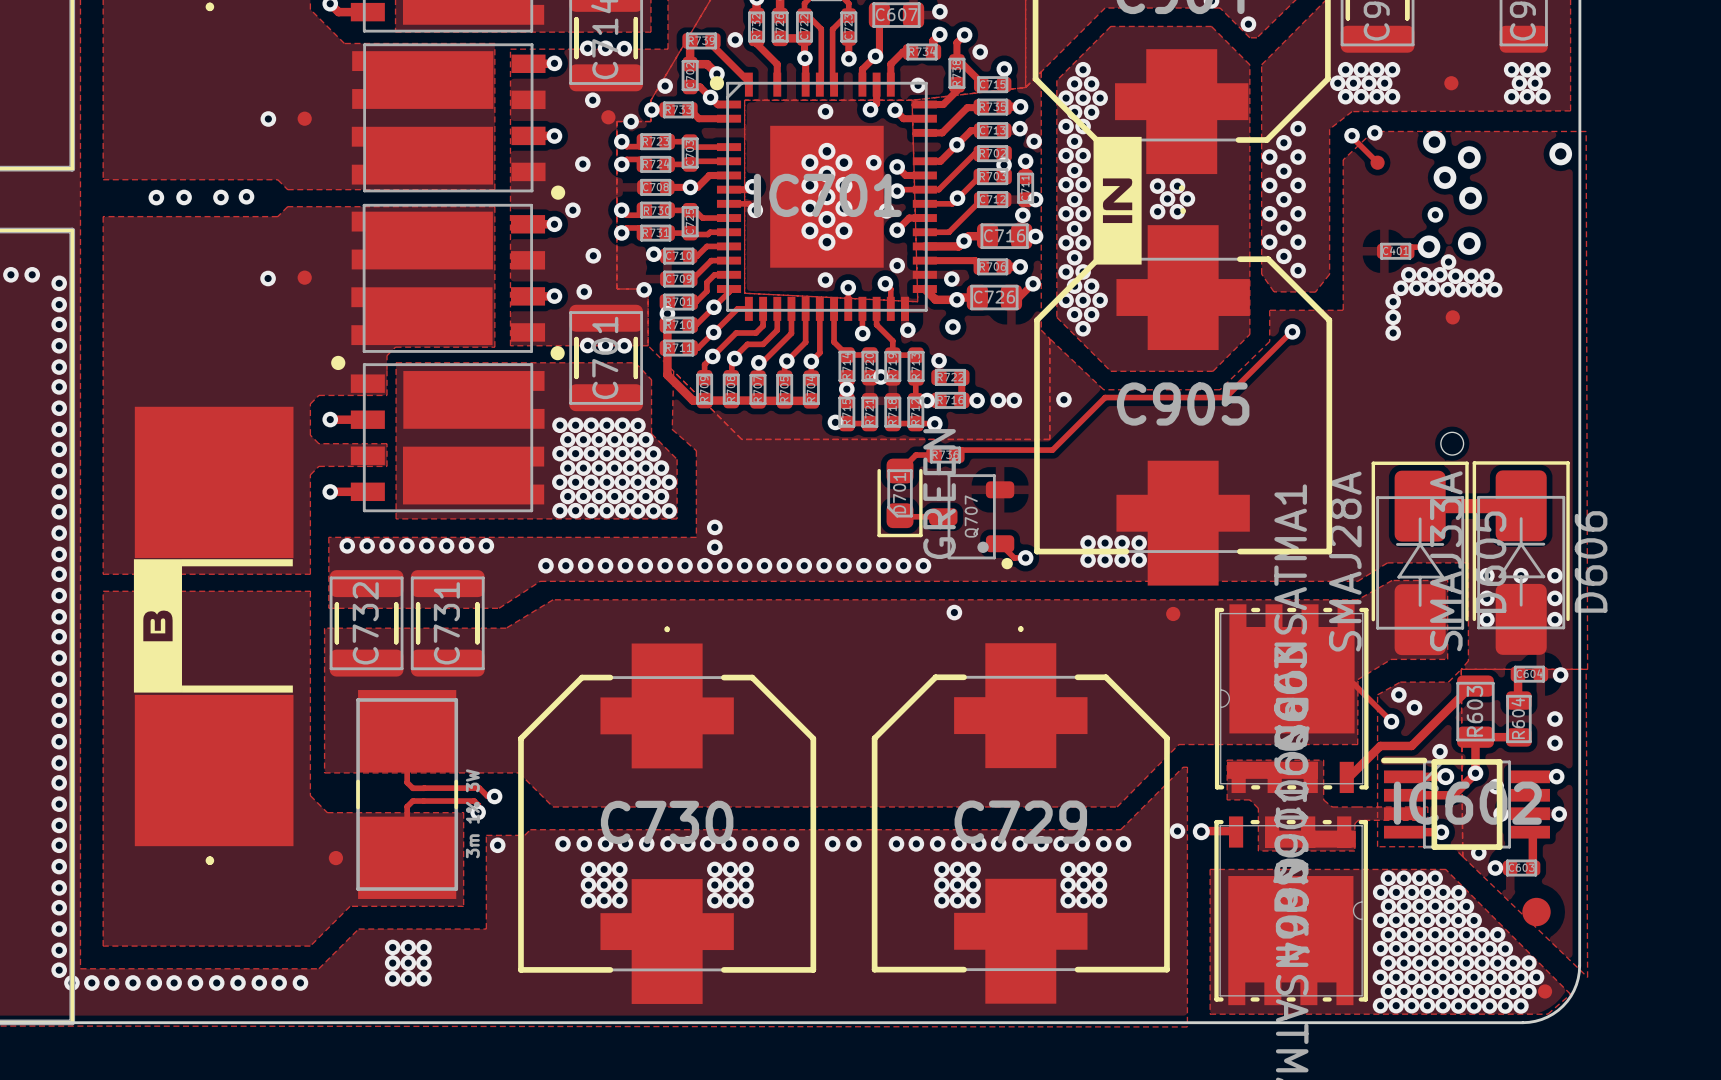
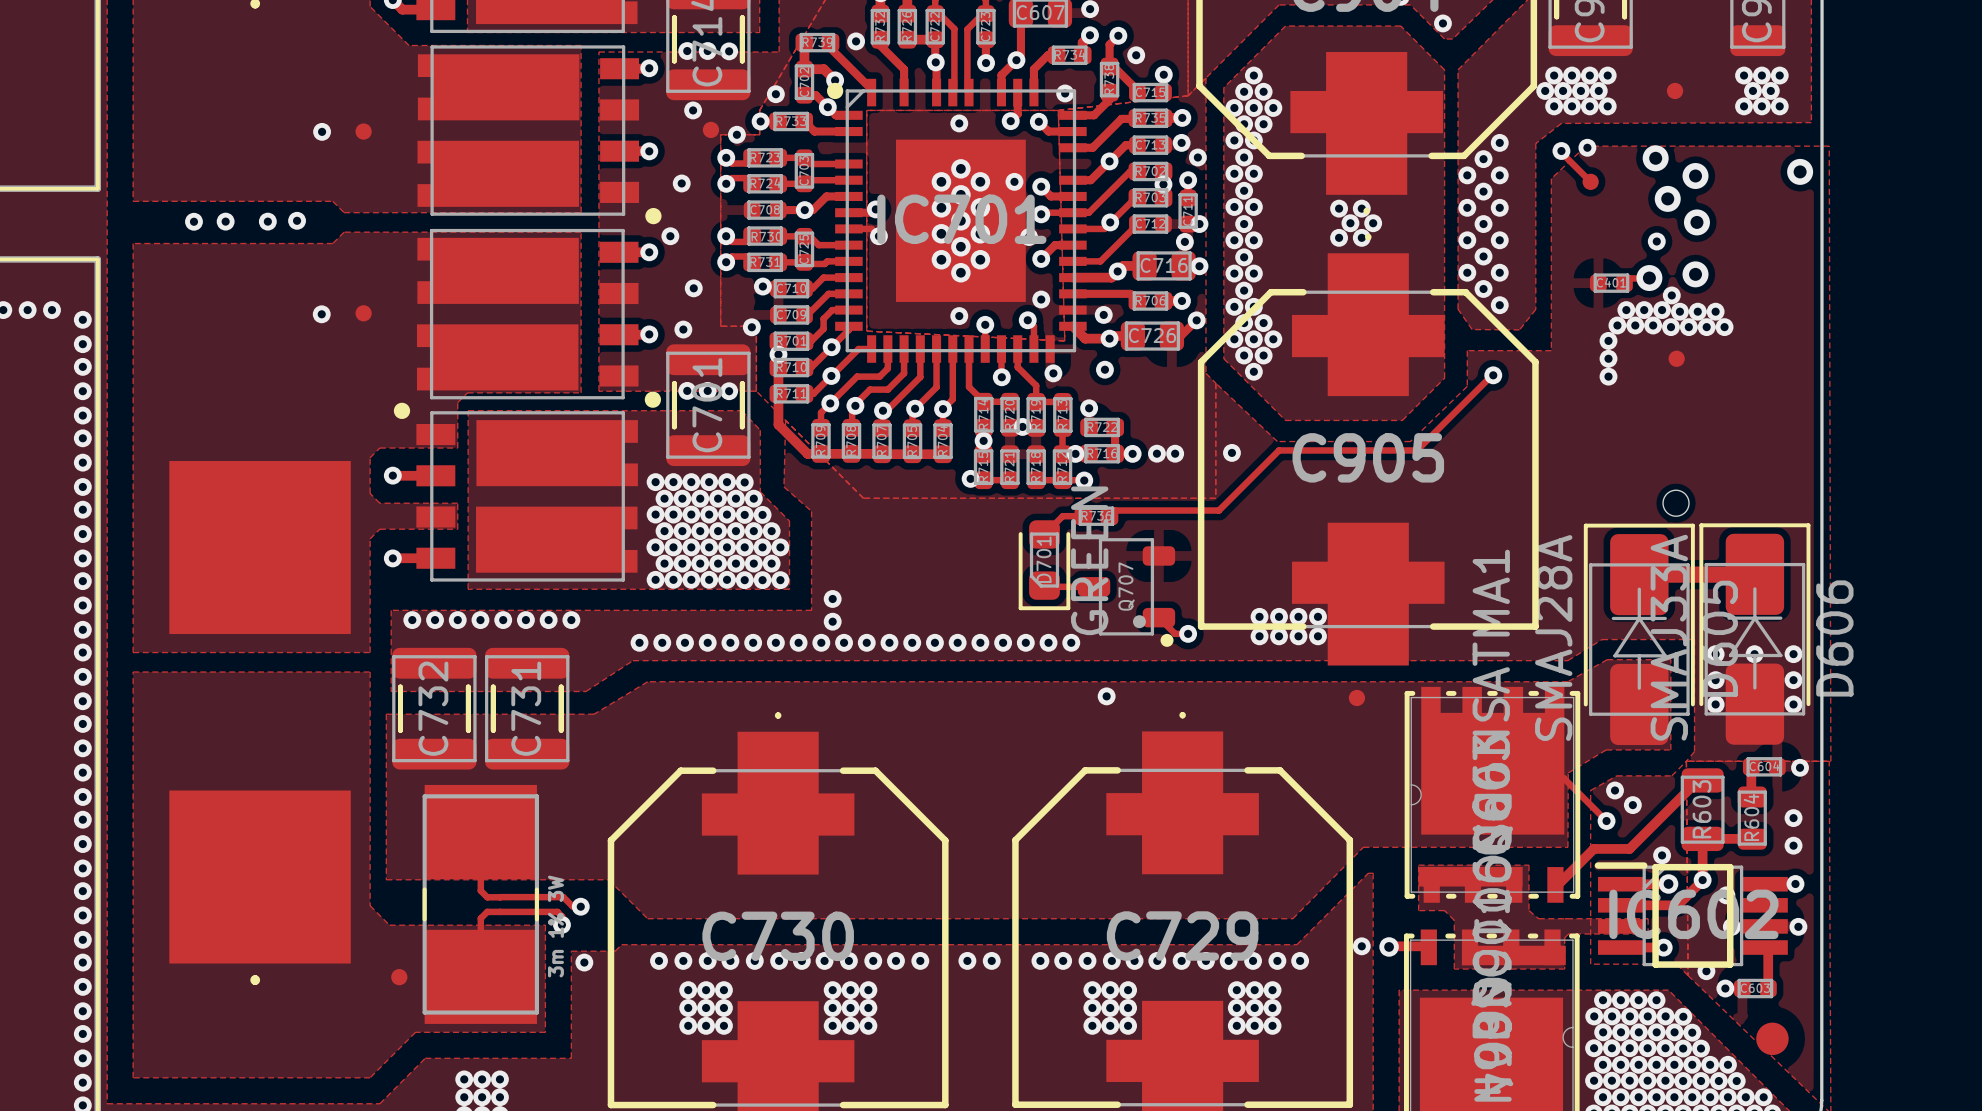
drawing: [1093, 136, 1142, 265] -> none
drawing: [133, 559, 293, 693] -> none

